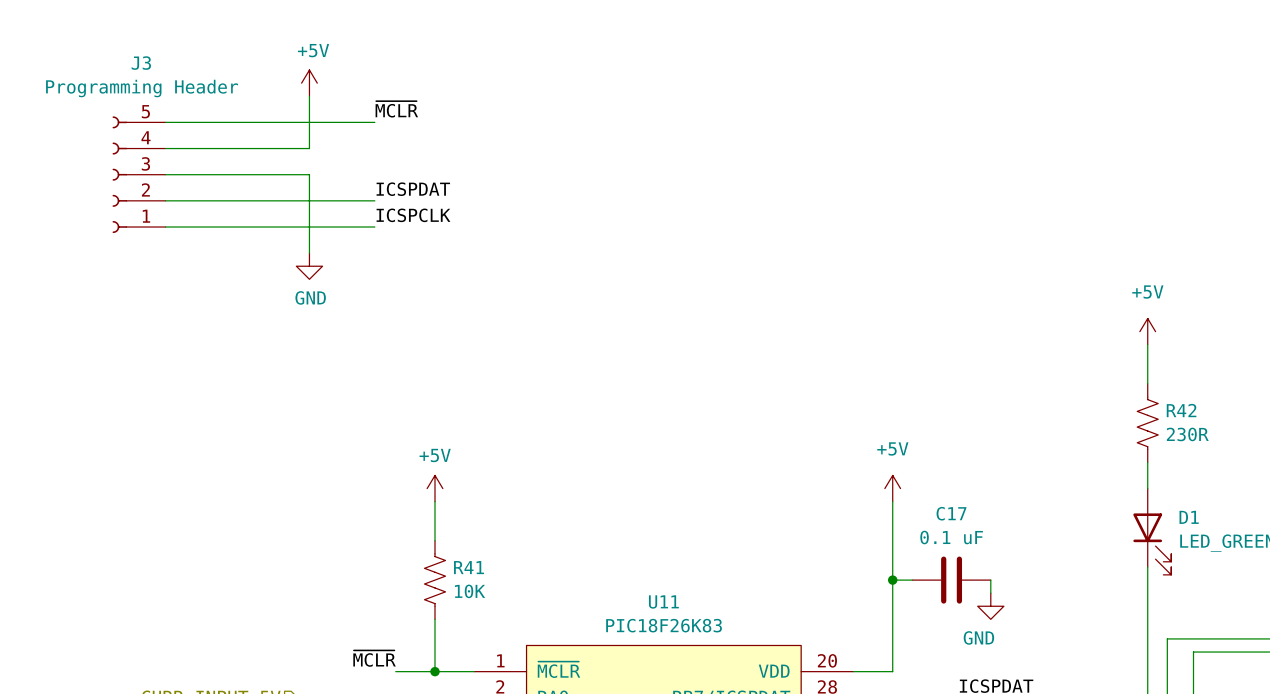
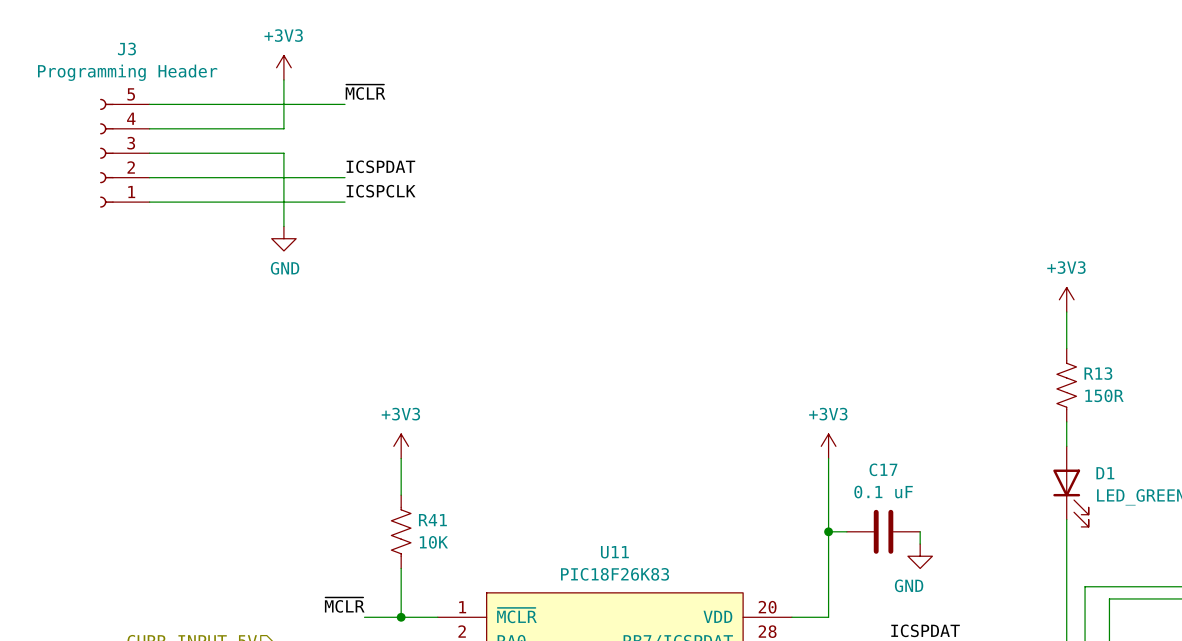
power symbol: +5V (309, 83) -> +3V3 (283, 67)
power symbol: +5V (1147, 331) -> +3V3 (1066, 299)
R42 name: R42 (1181, 410) -> R13 (1098, 373)
R42 value: 230R (1187, 434) -> 150R (1104, 395)
power symbol: +5V (435, 488) -> +3V3 (401, 446)
power symbol: +5V (892, 488) -> +3V3 (828, 446)

